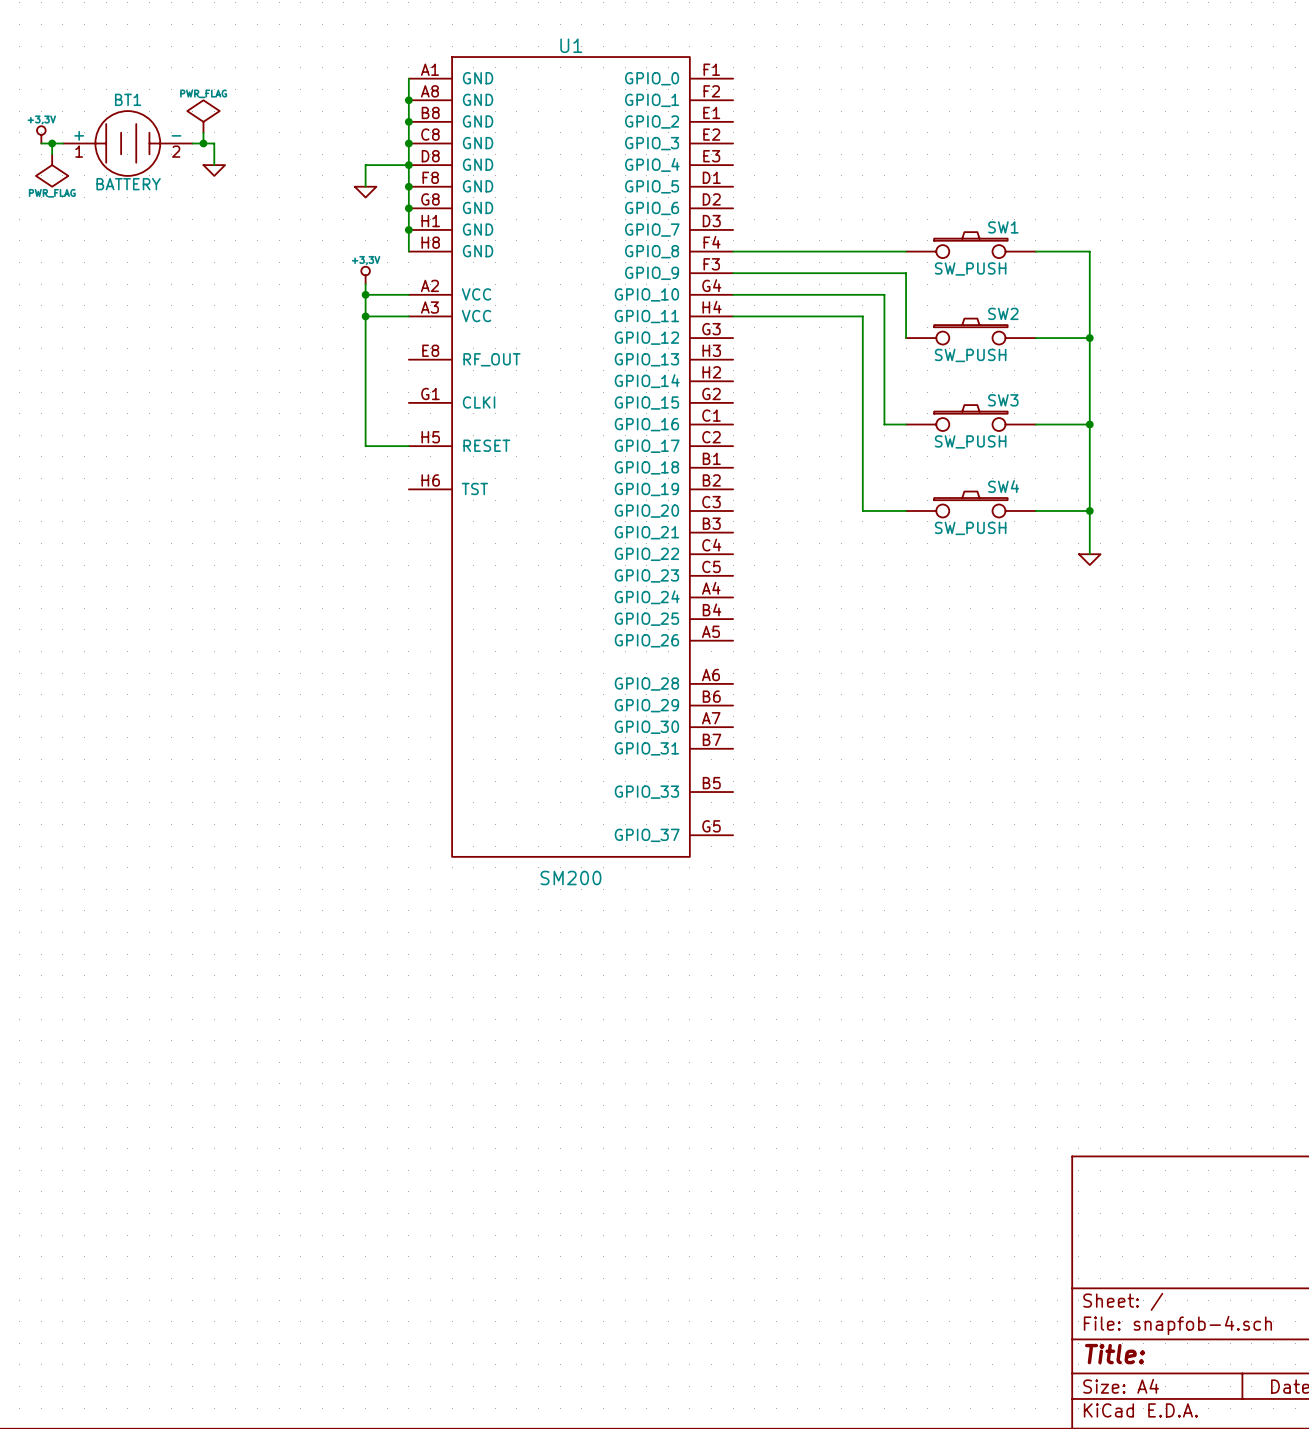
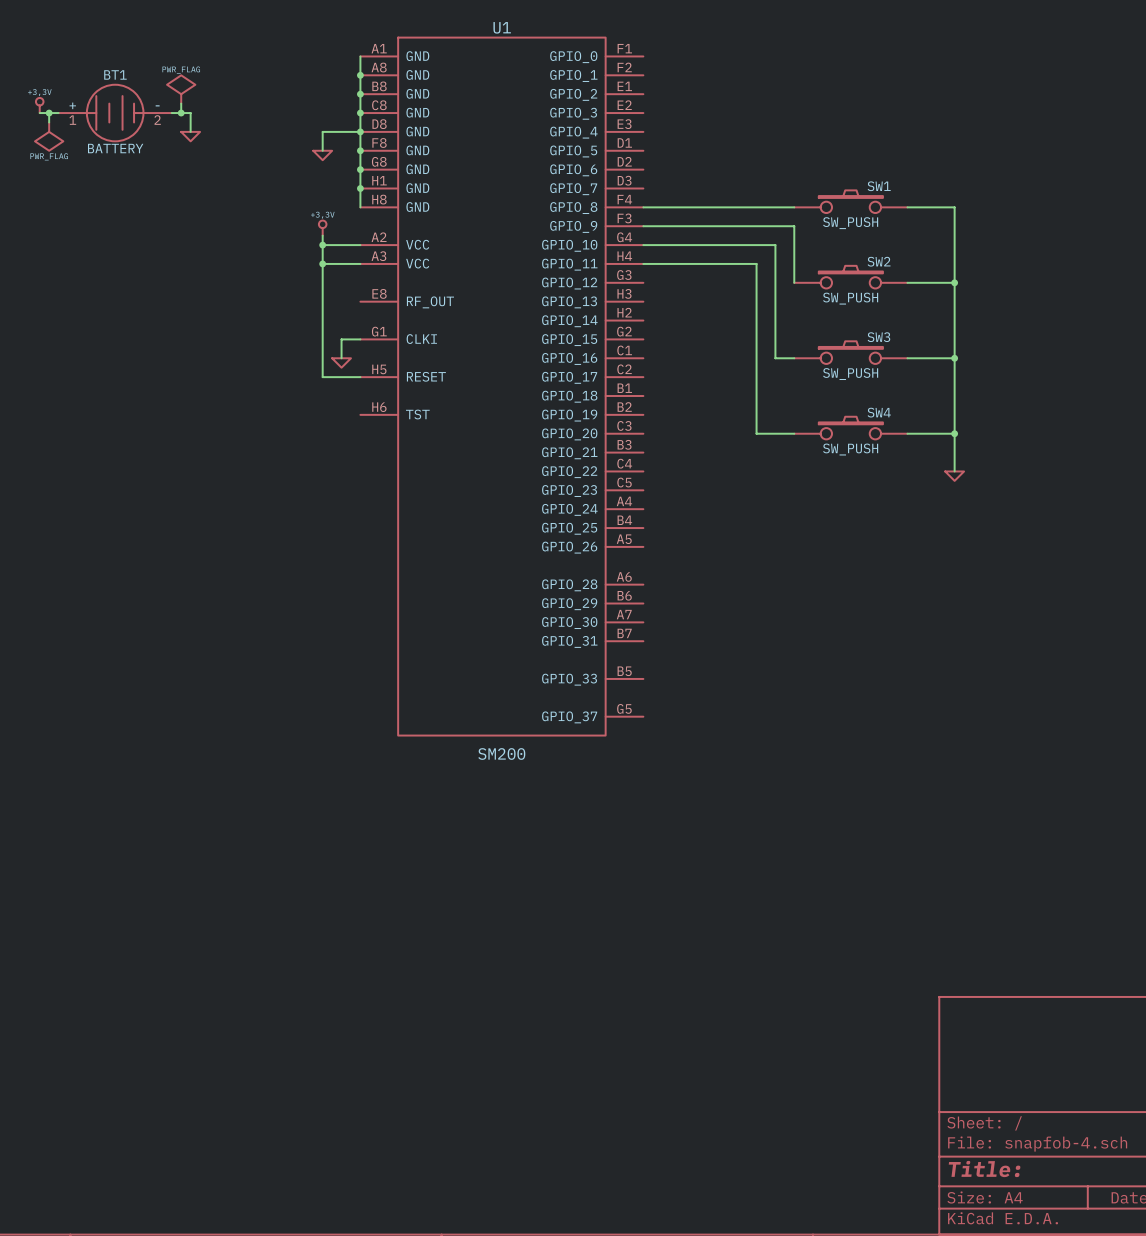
wire: none -> (360, 339) (341, 339) (341, 358)
power symbol: none -> (341, 362)

